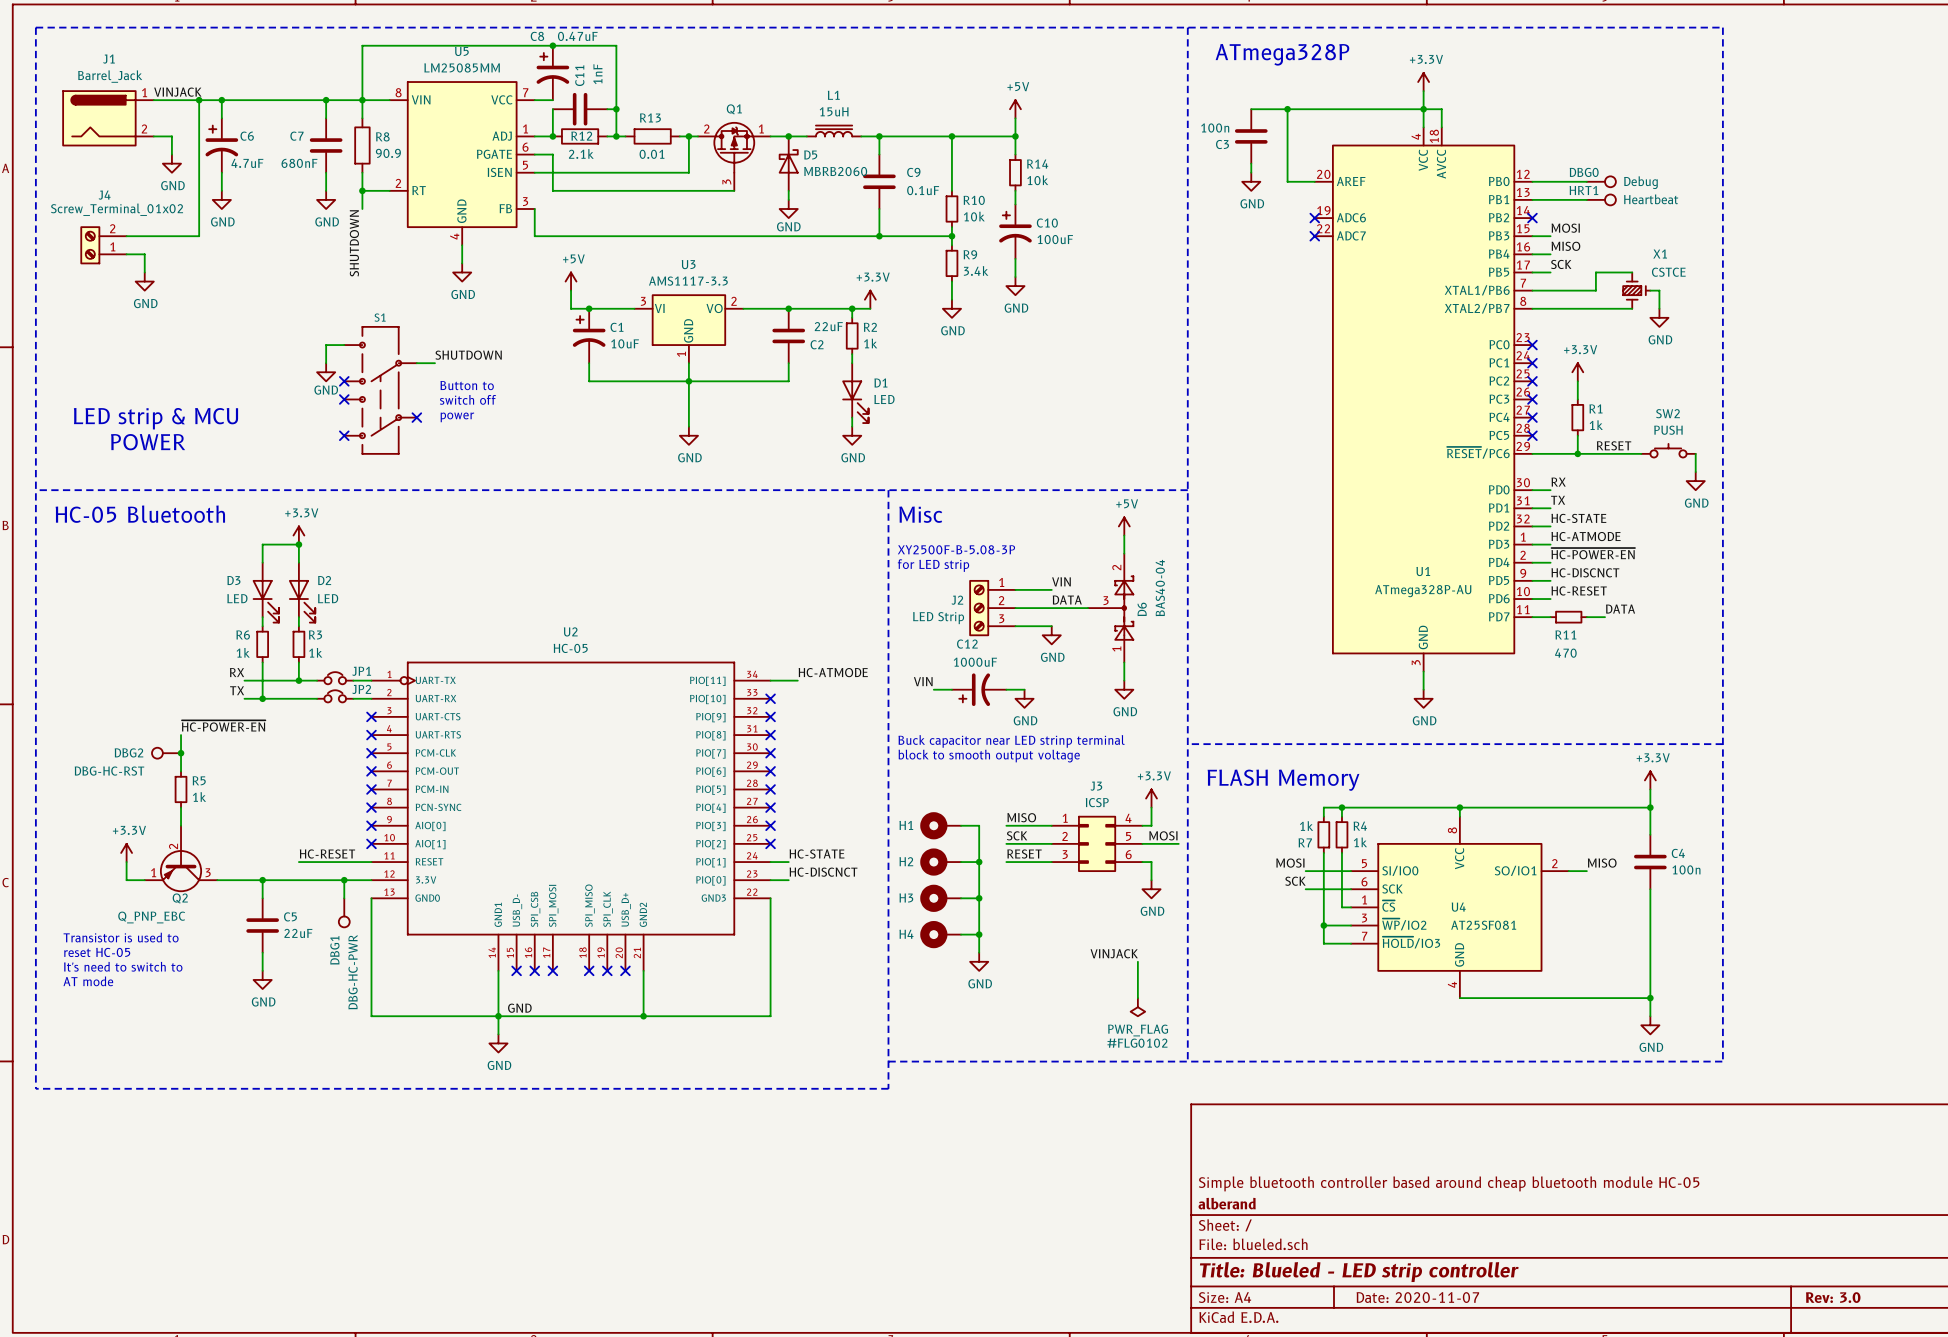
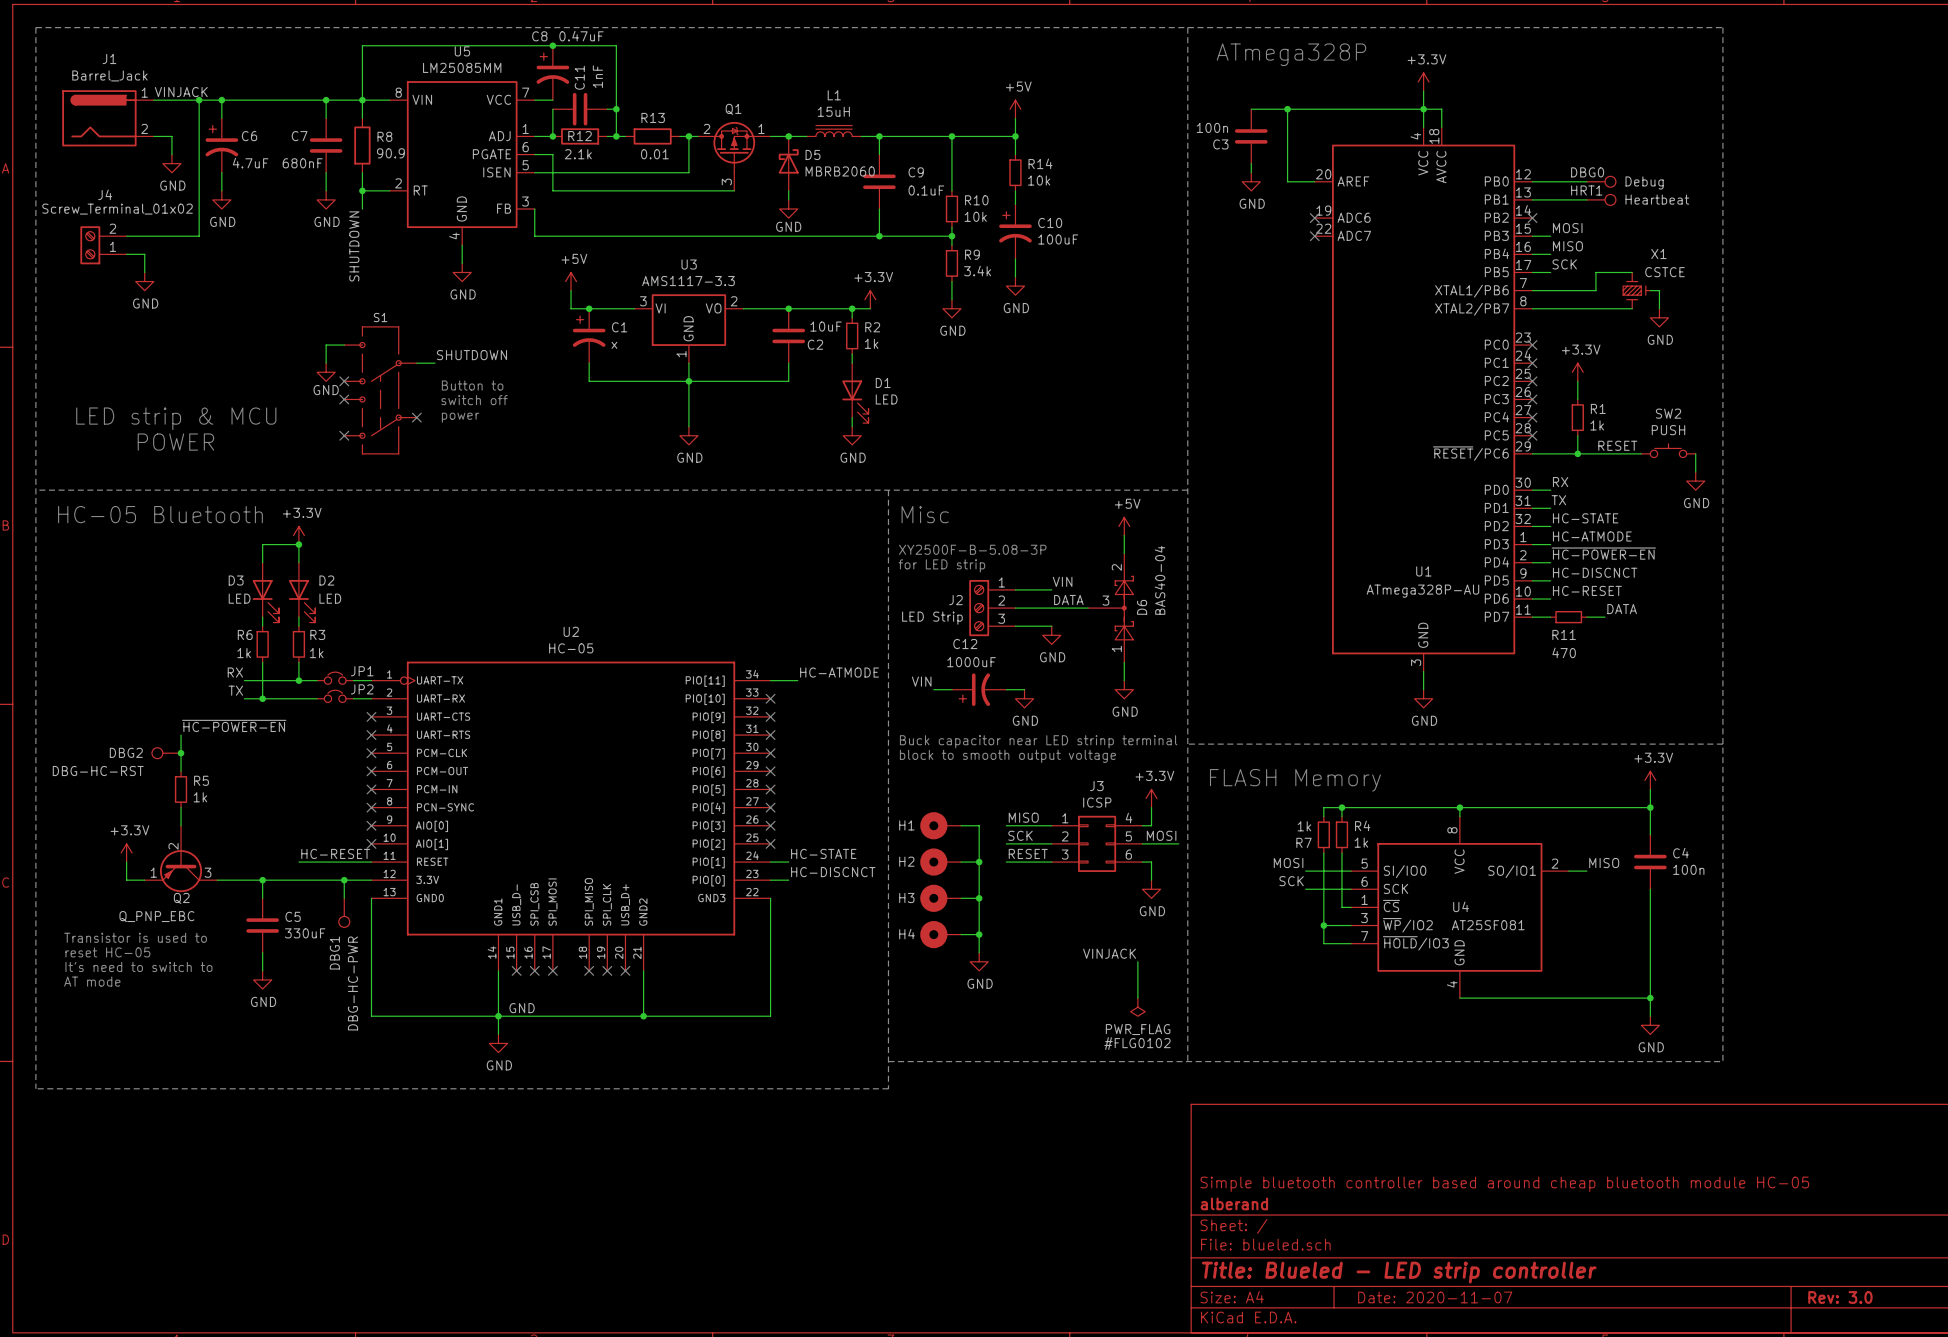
C2 value: 22uF (828, 326) -> 10uF (826, 326)
C1 value: 10uF (625, 343) -> x (614, 345)
C5 value: 22uF (298, 933) -> 330uF (305, 933)

